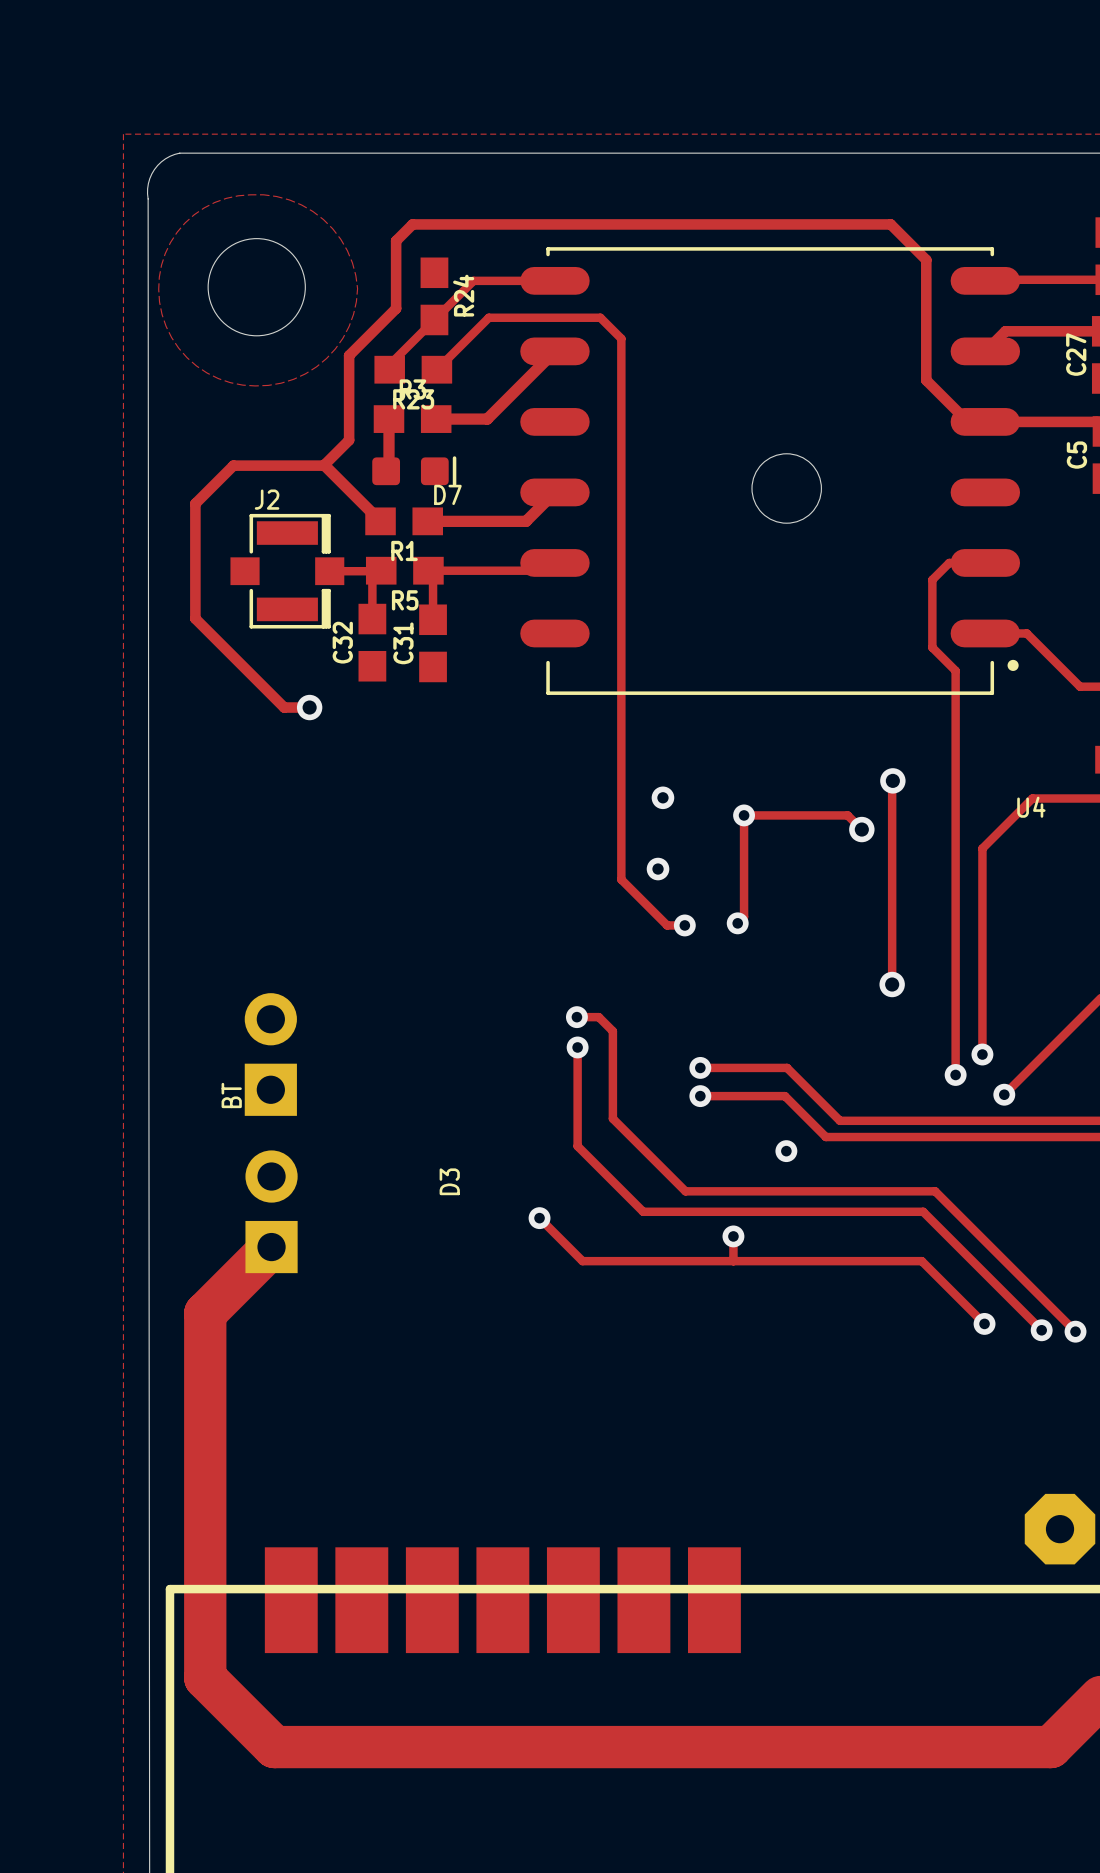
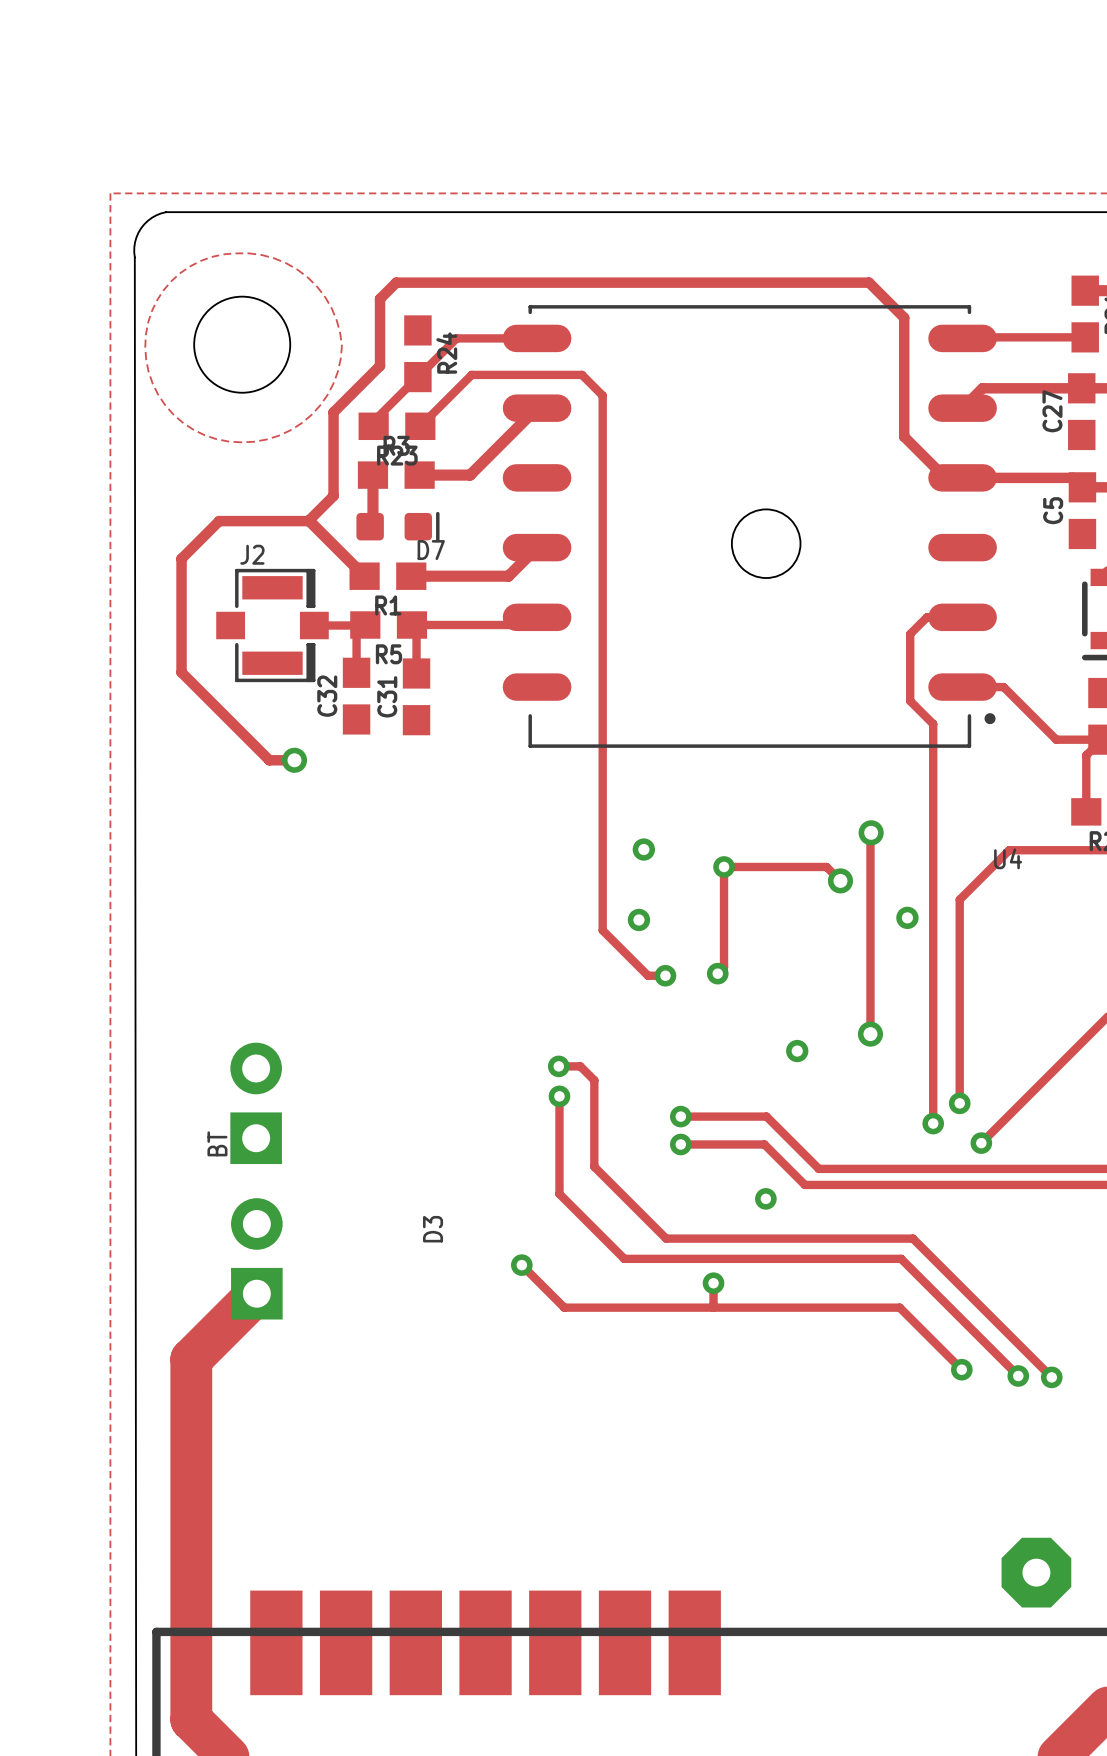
via: none -> (907, 917)
via: none -> (797, 1051)

